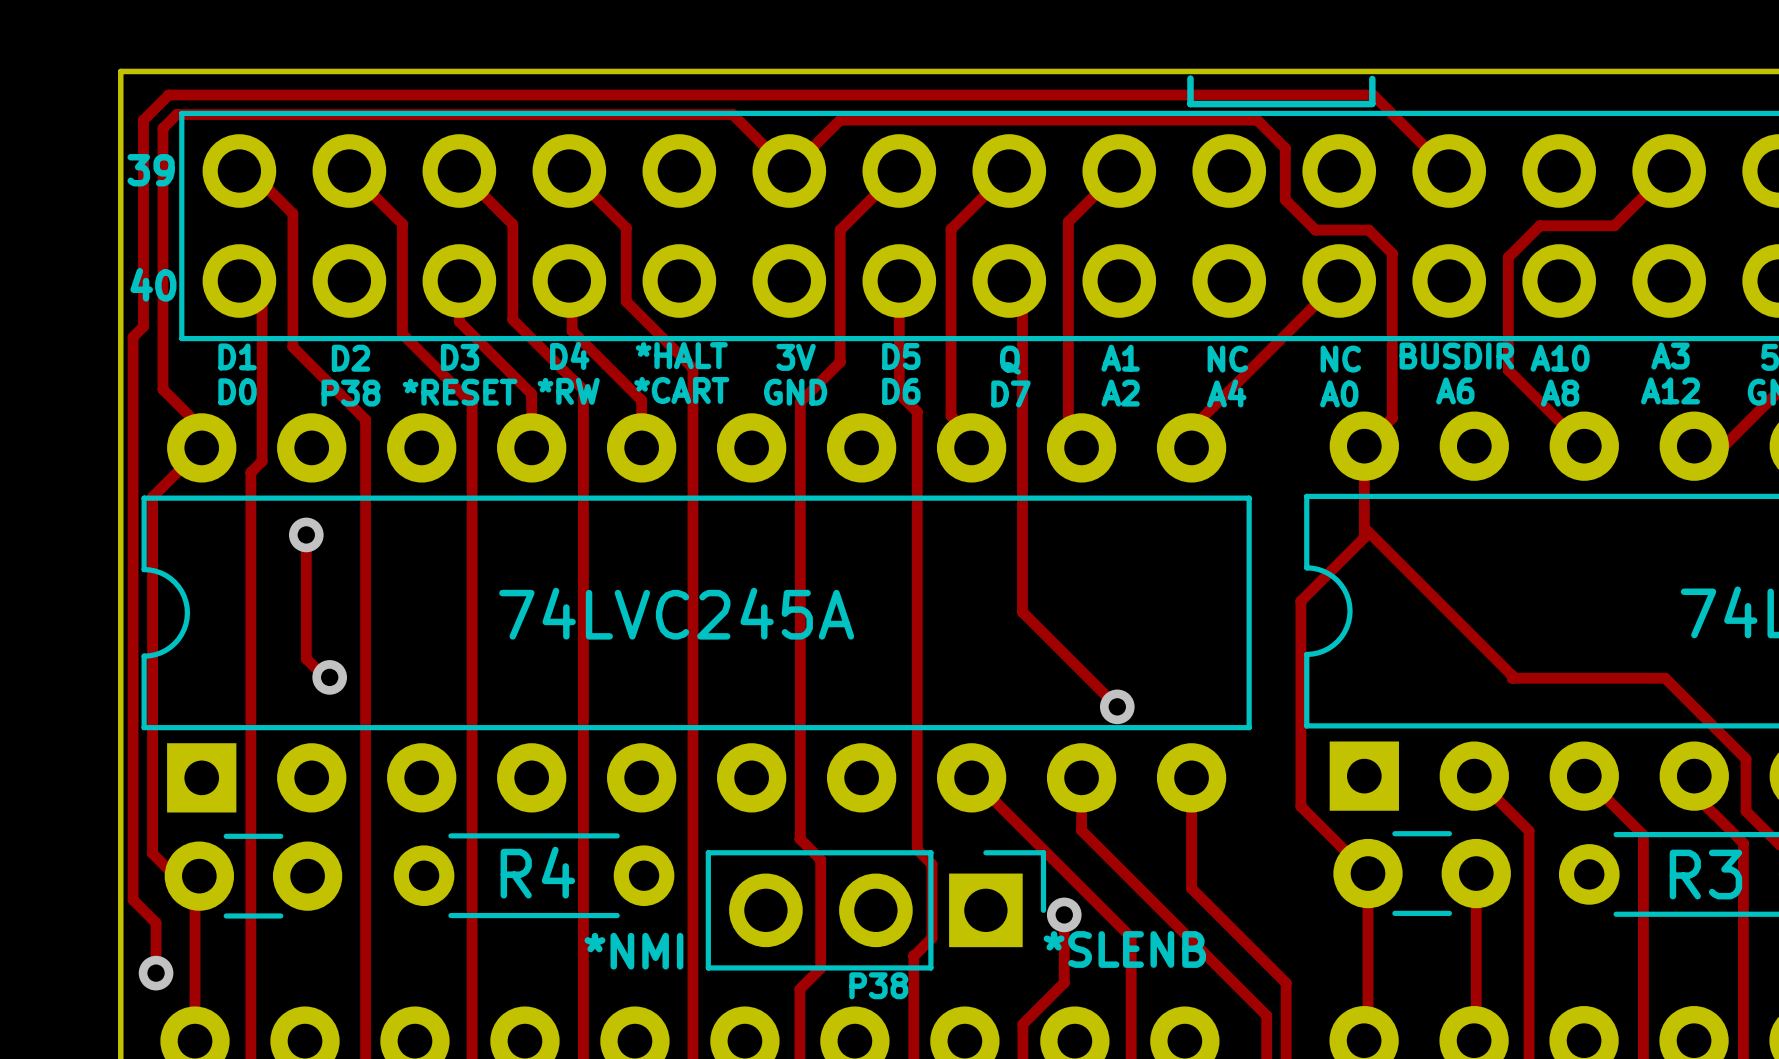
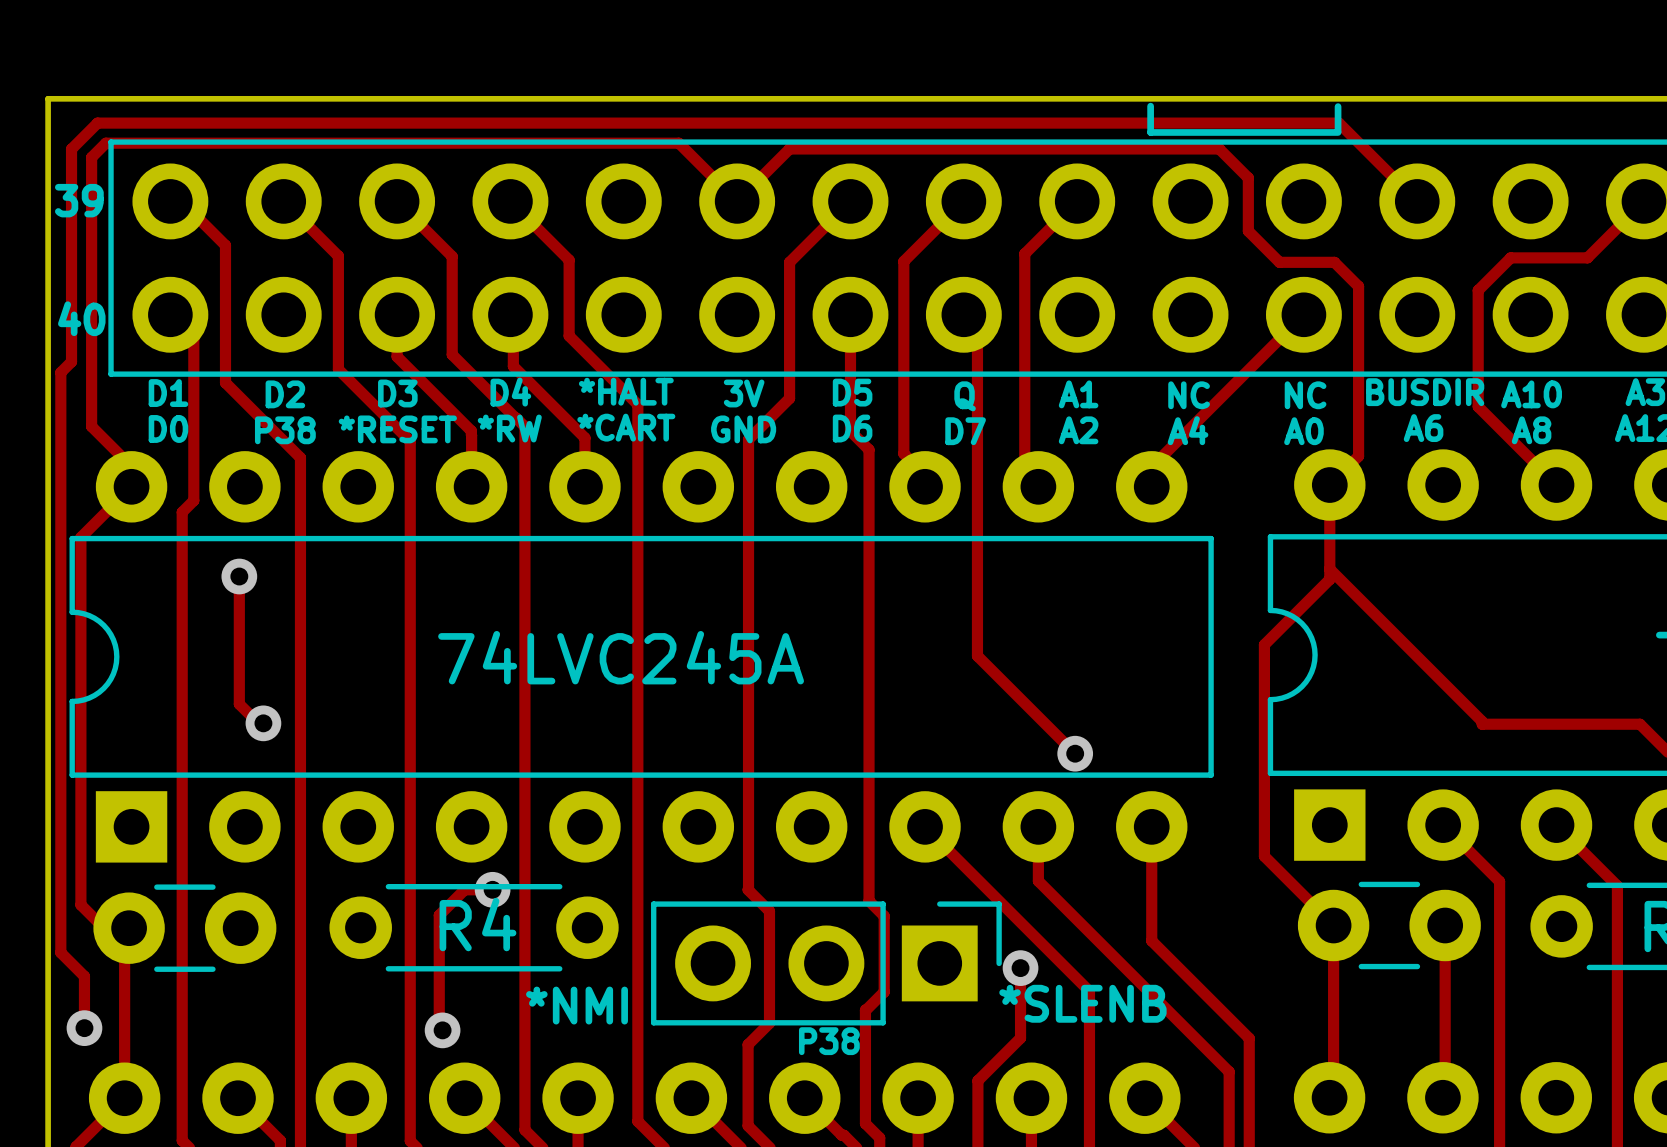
track: none -> (492, 889) (464, 889) (439, 915) (439, 1027) (442, 1030)
via: none -> (492, 889)
via: none -> (442, 1030)

